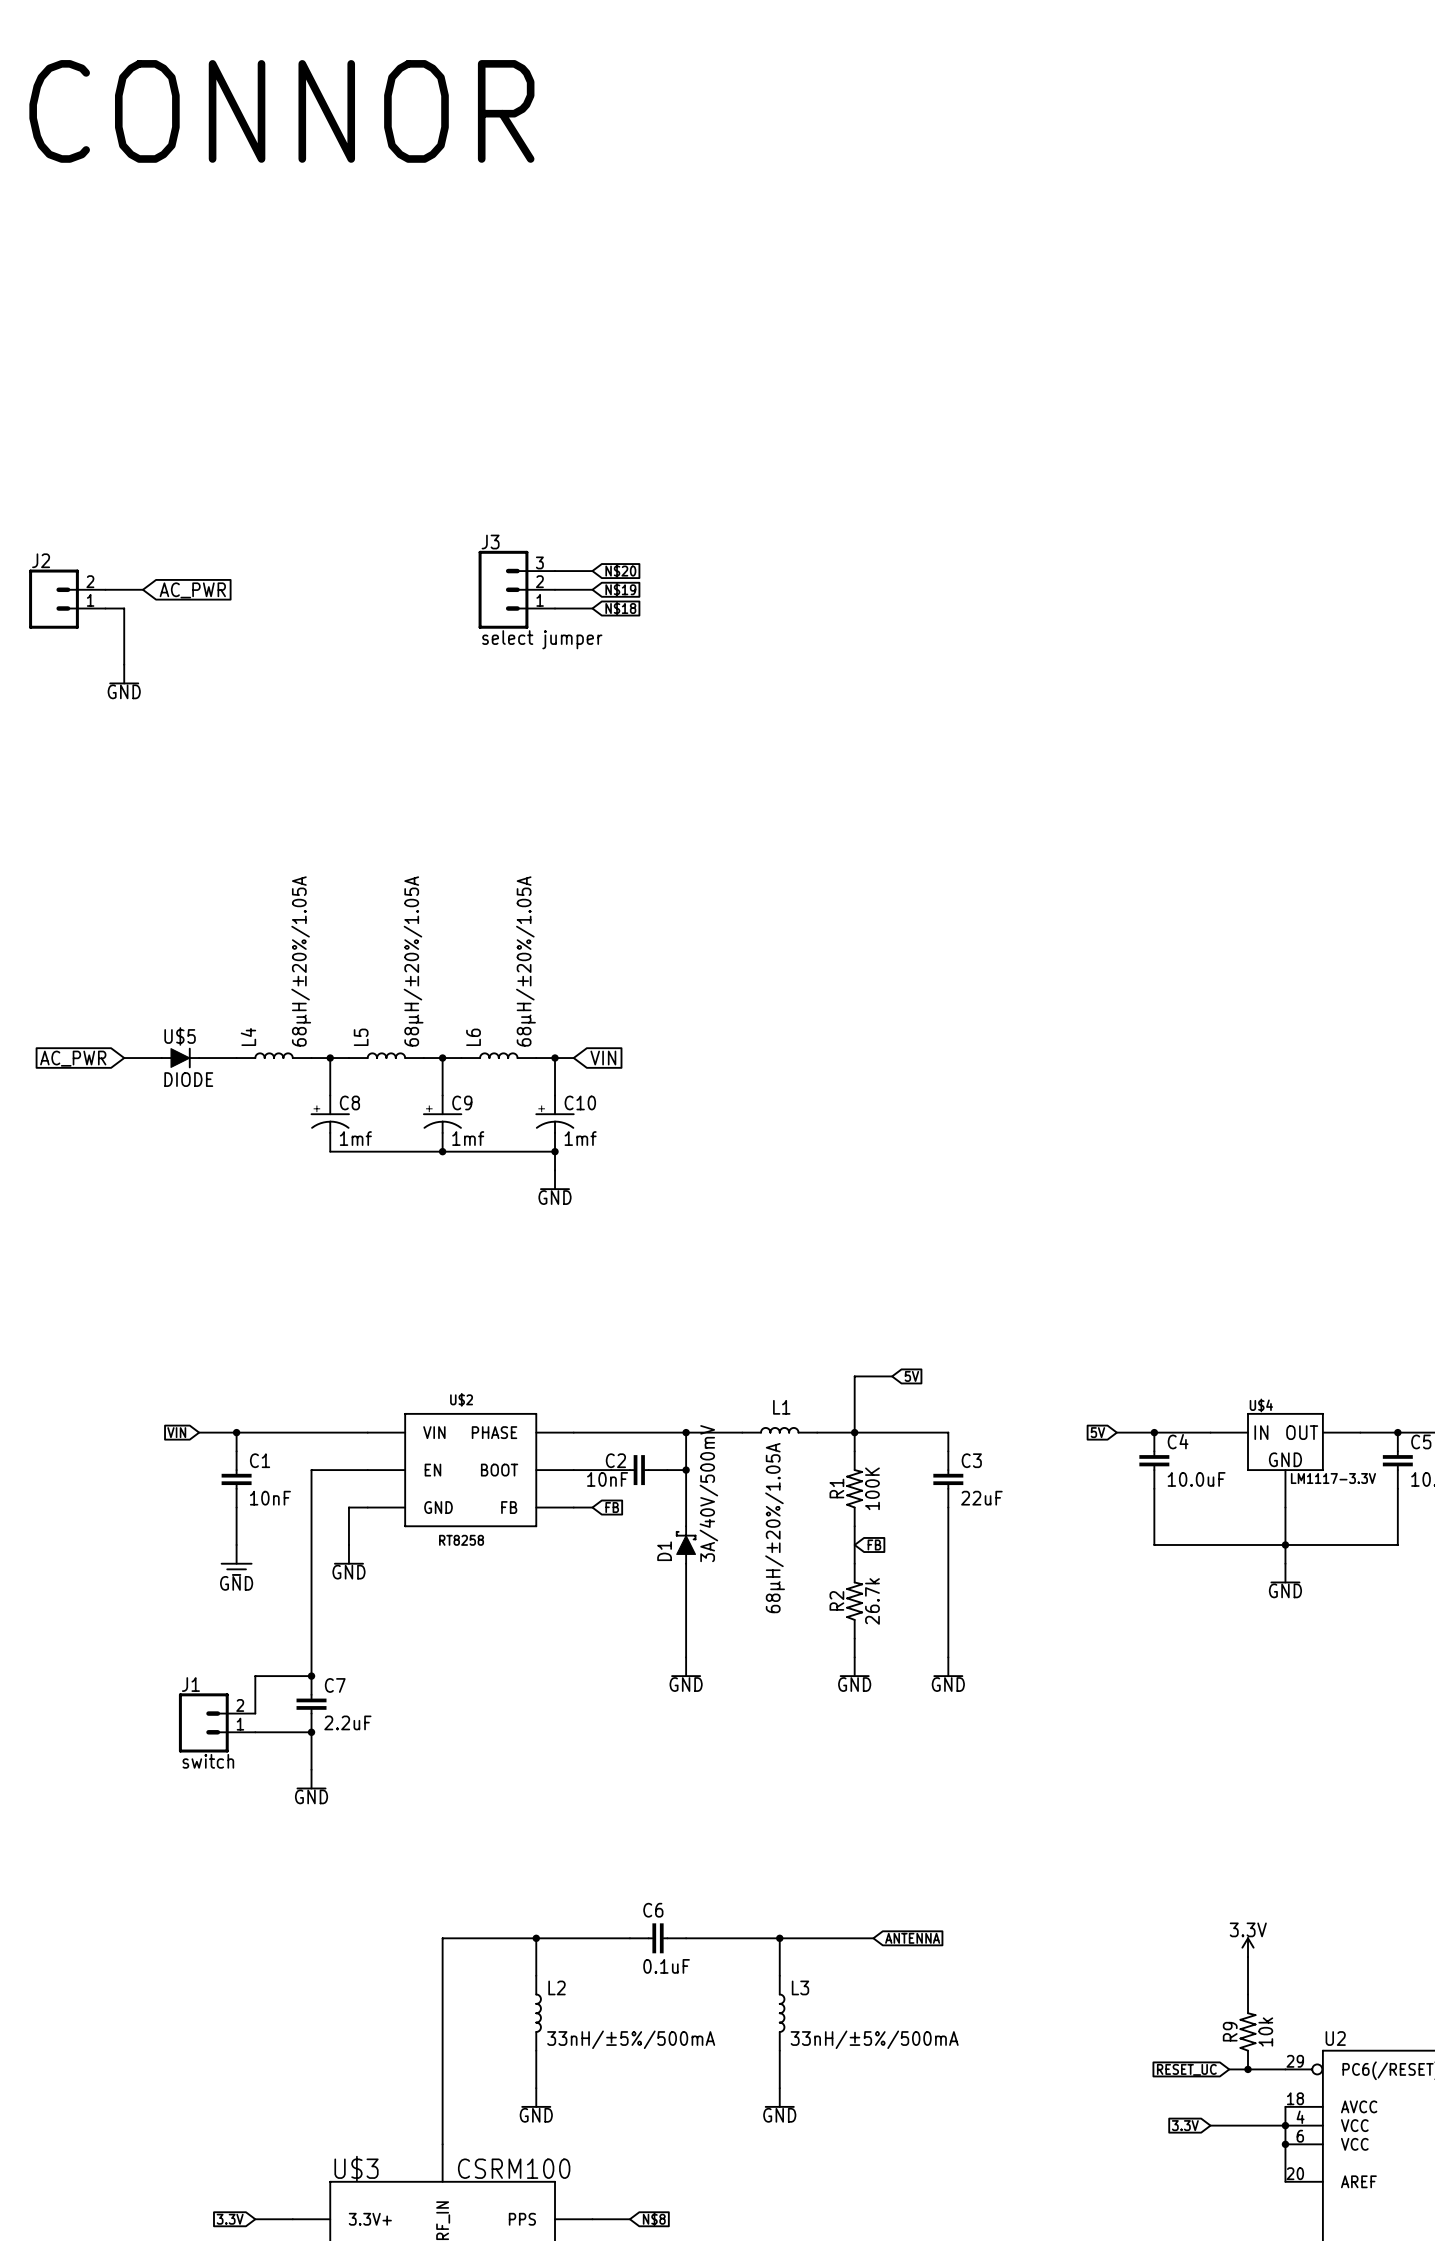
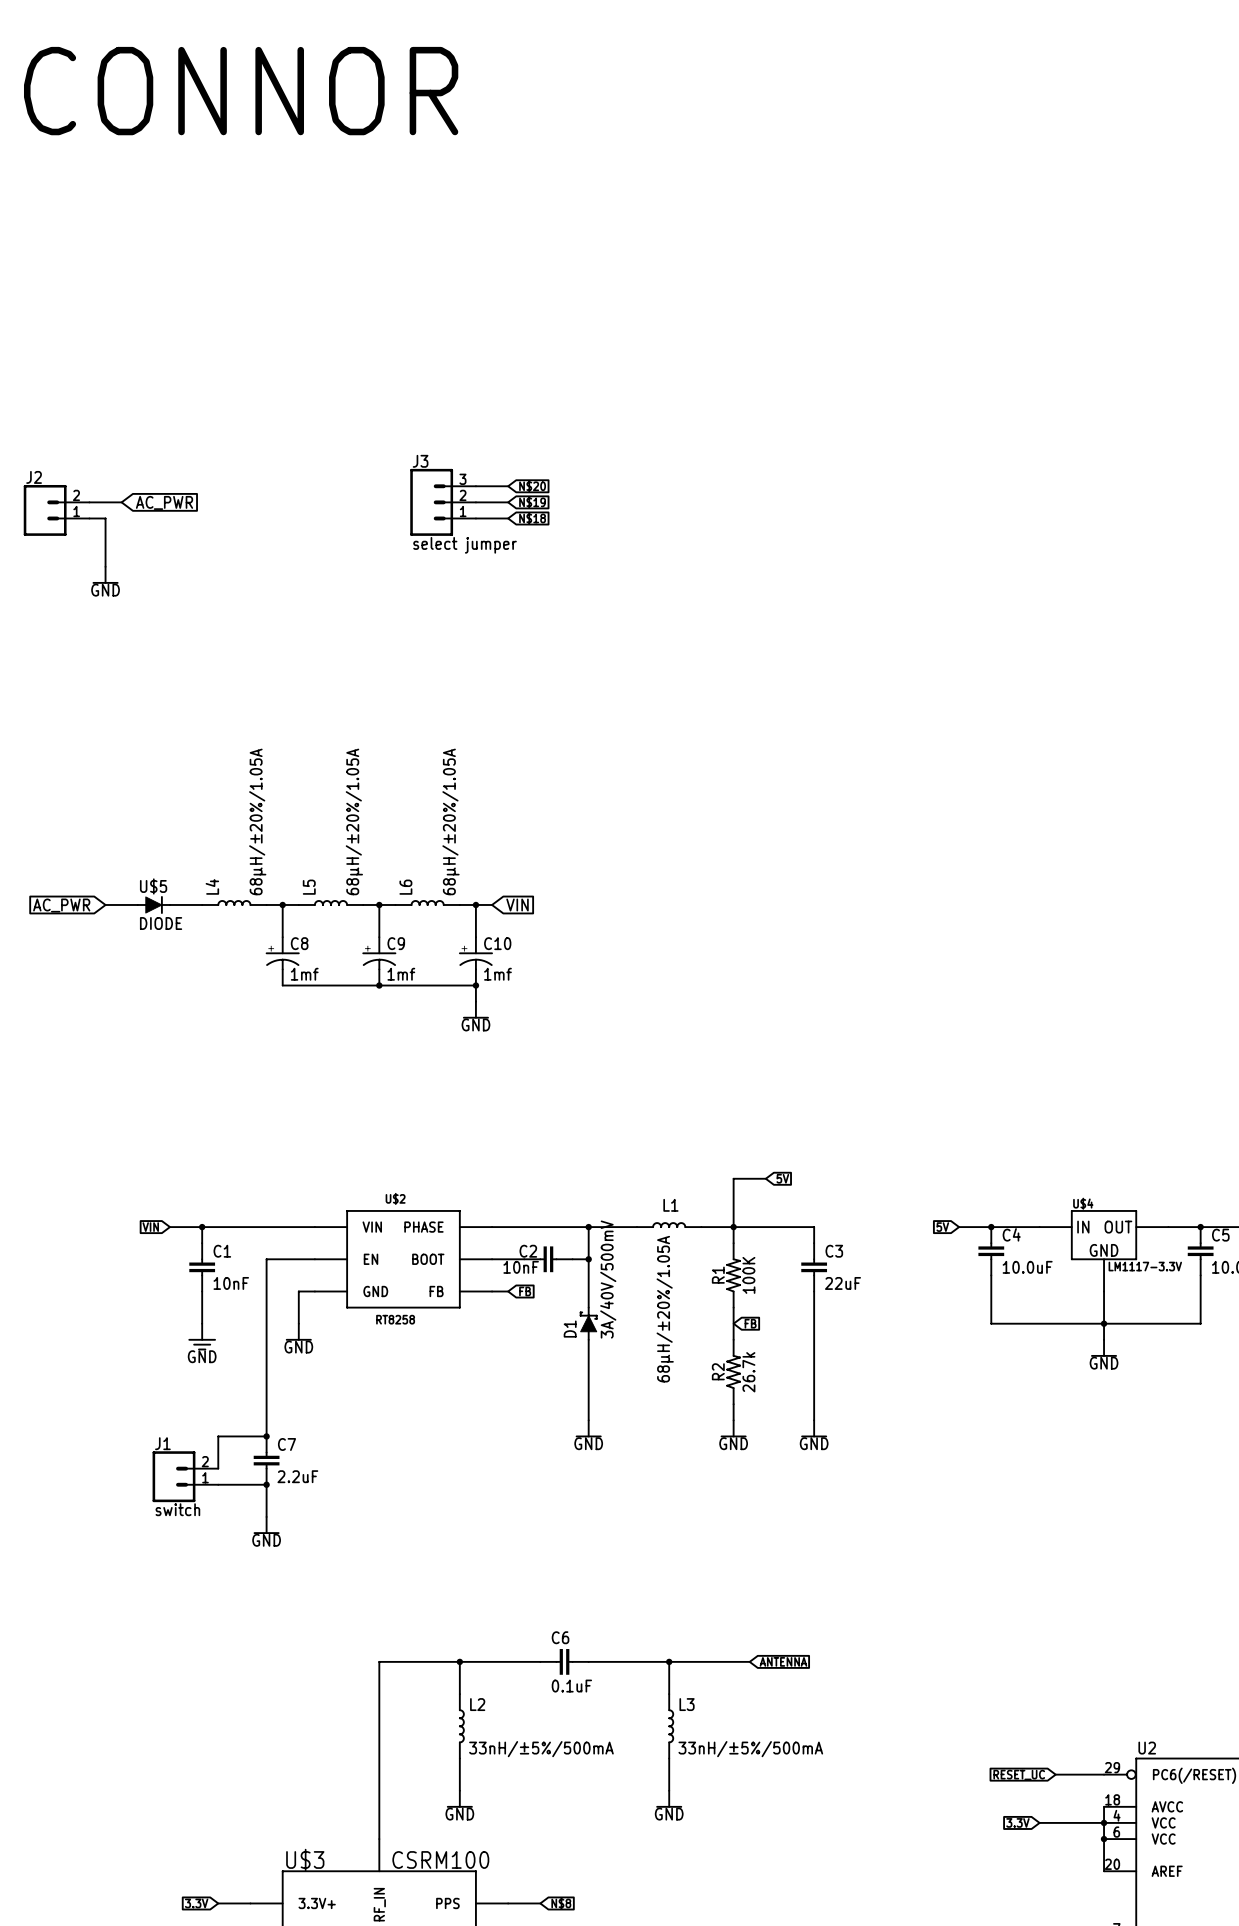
power symbol: 3.3V (1248, 1947) -> none
wire: (1248, 1957) (1248, 1994) -> none
R9: 10k (1248, 2031) -> none
junction: (1248, 2069) -> none

